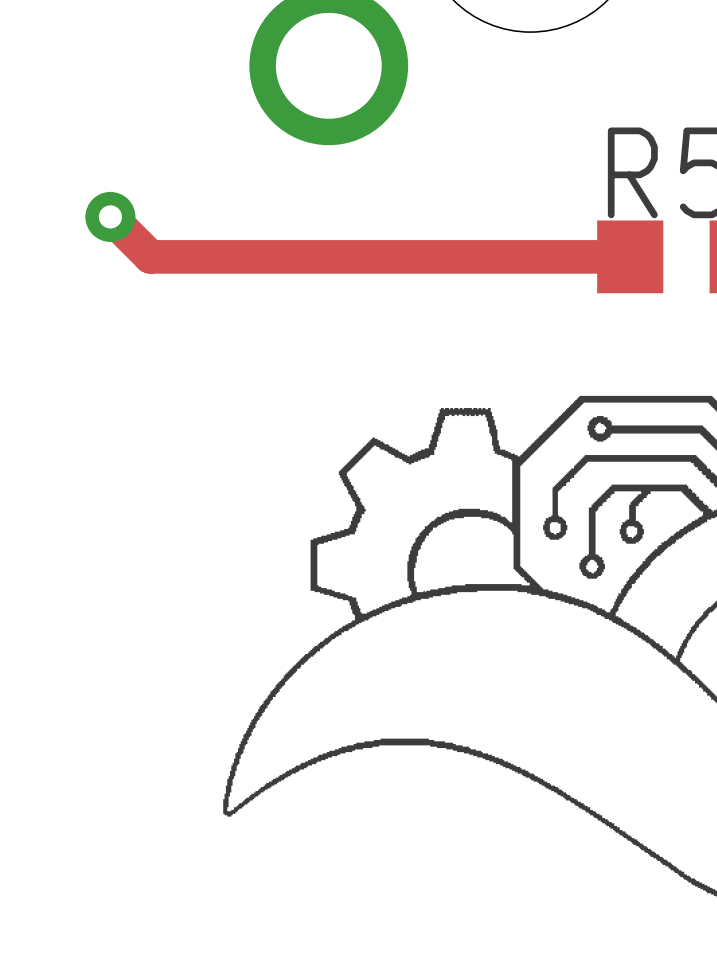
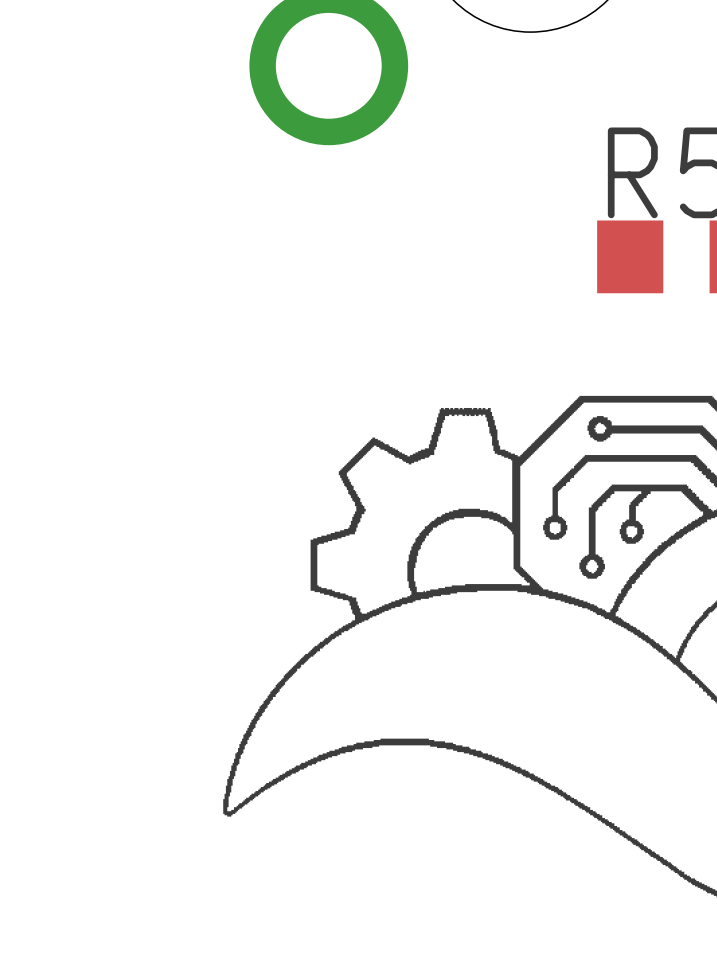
track: (110, 216) (150, 256) (630, 256) -> none
via: (110, 216) -> none

